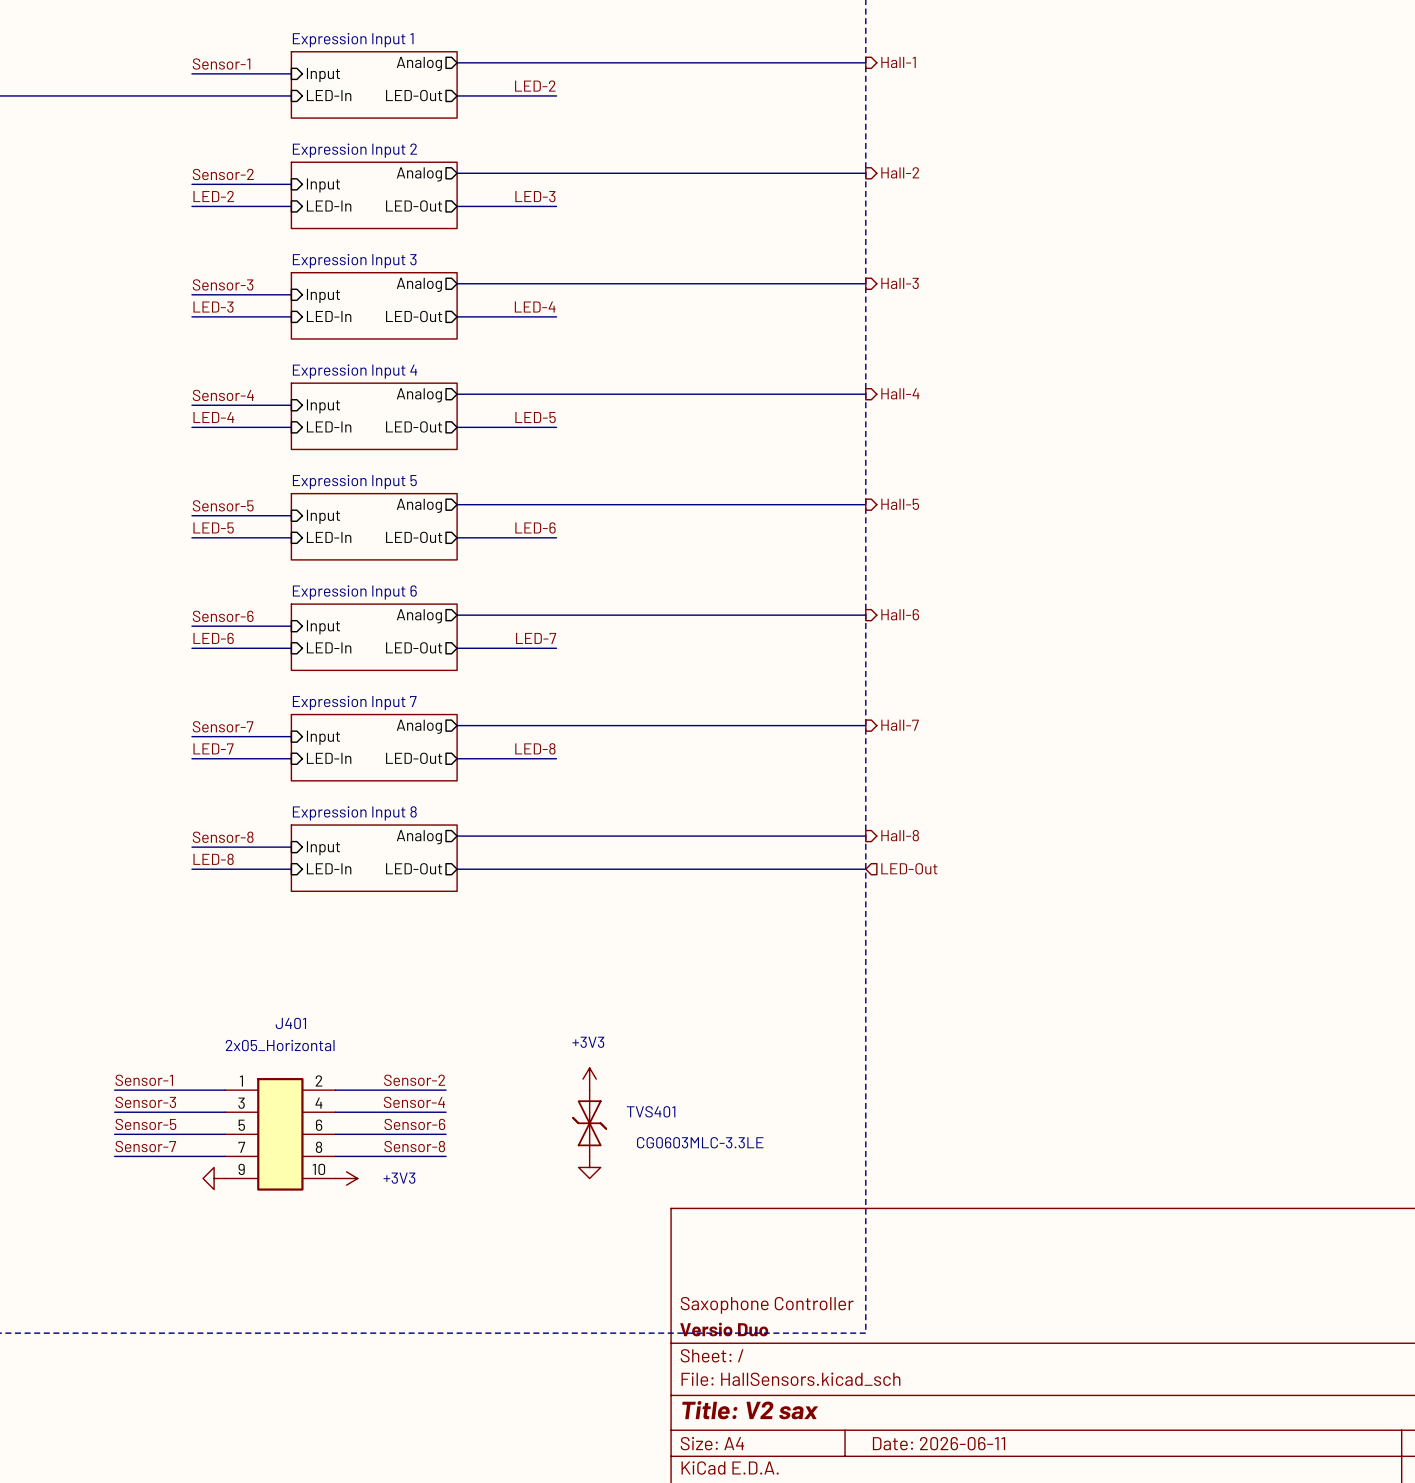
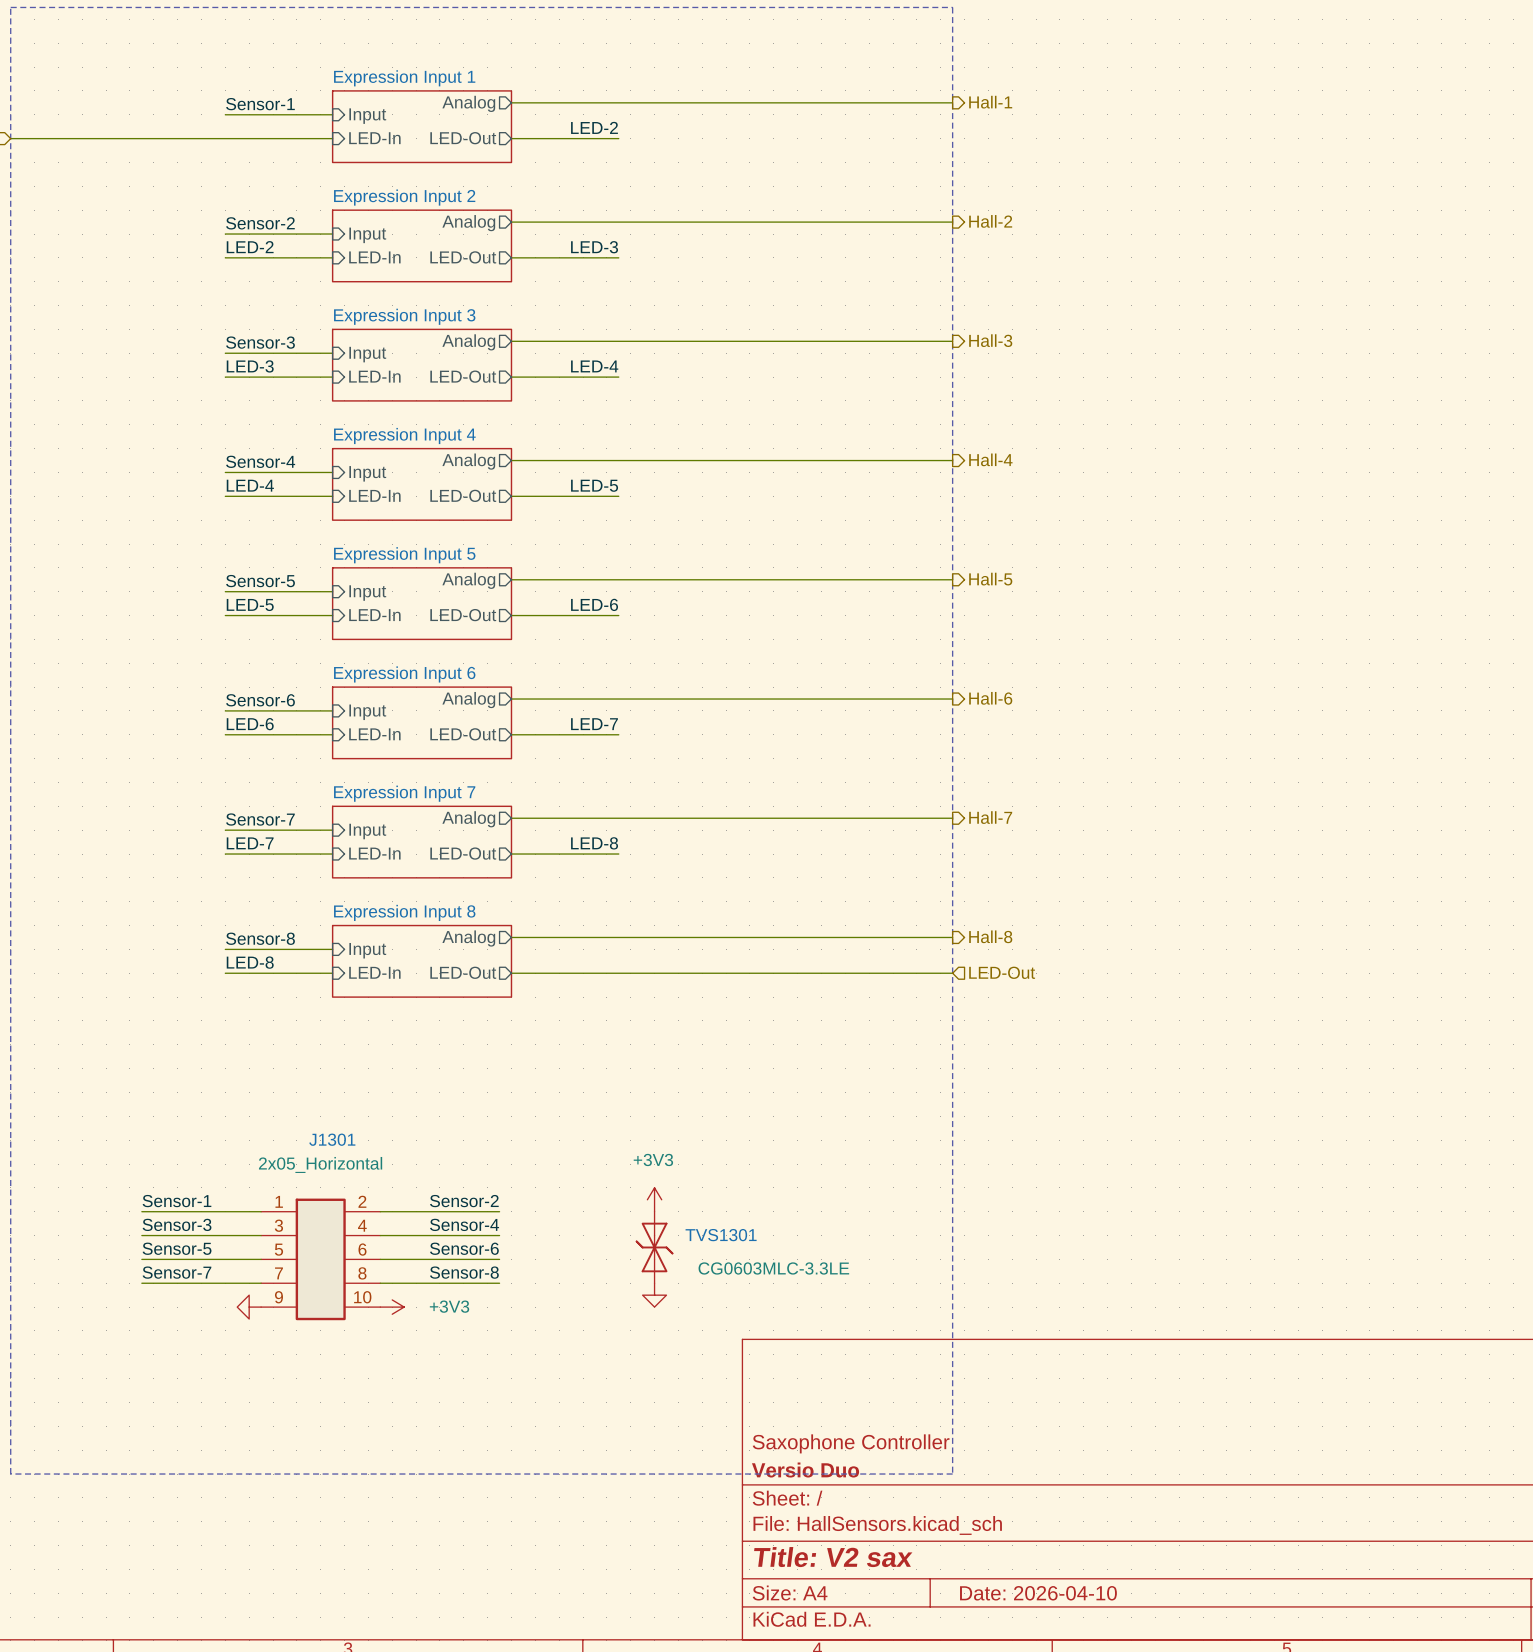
J401 name: J401 (290, 1023) -> J1301 (332, 1139)
TVS401 name: TVS401 (651, 1111) -> TVS1301 (721, 1235)
title block: Date: 2026-06-11 (939, 1443) -> Date: 2026-04-10 (1038, 1593)

